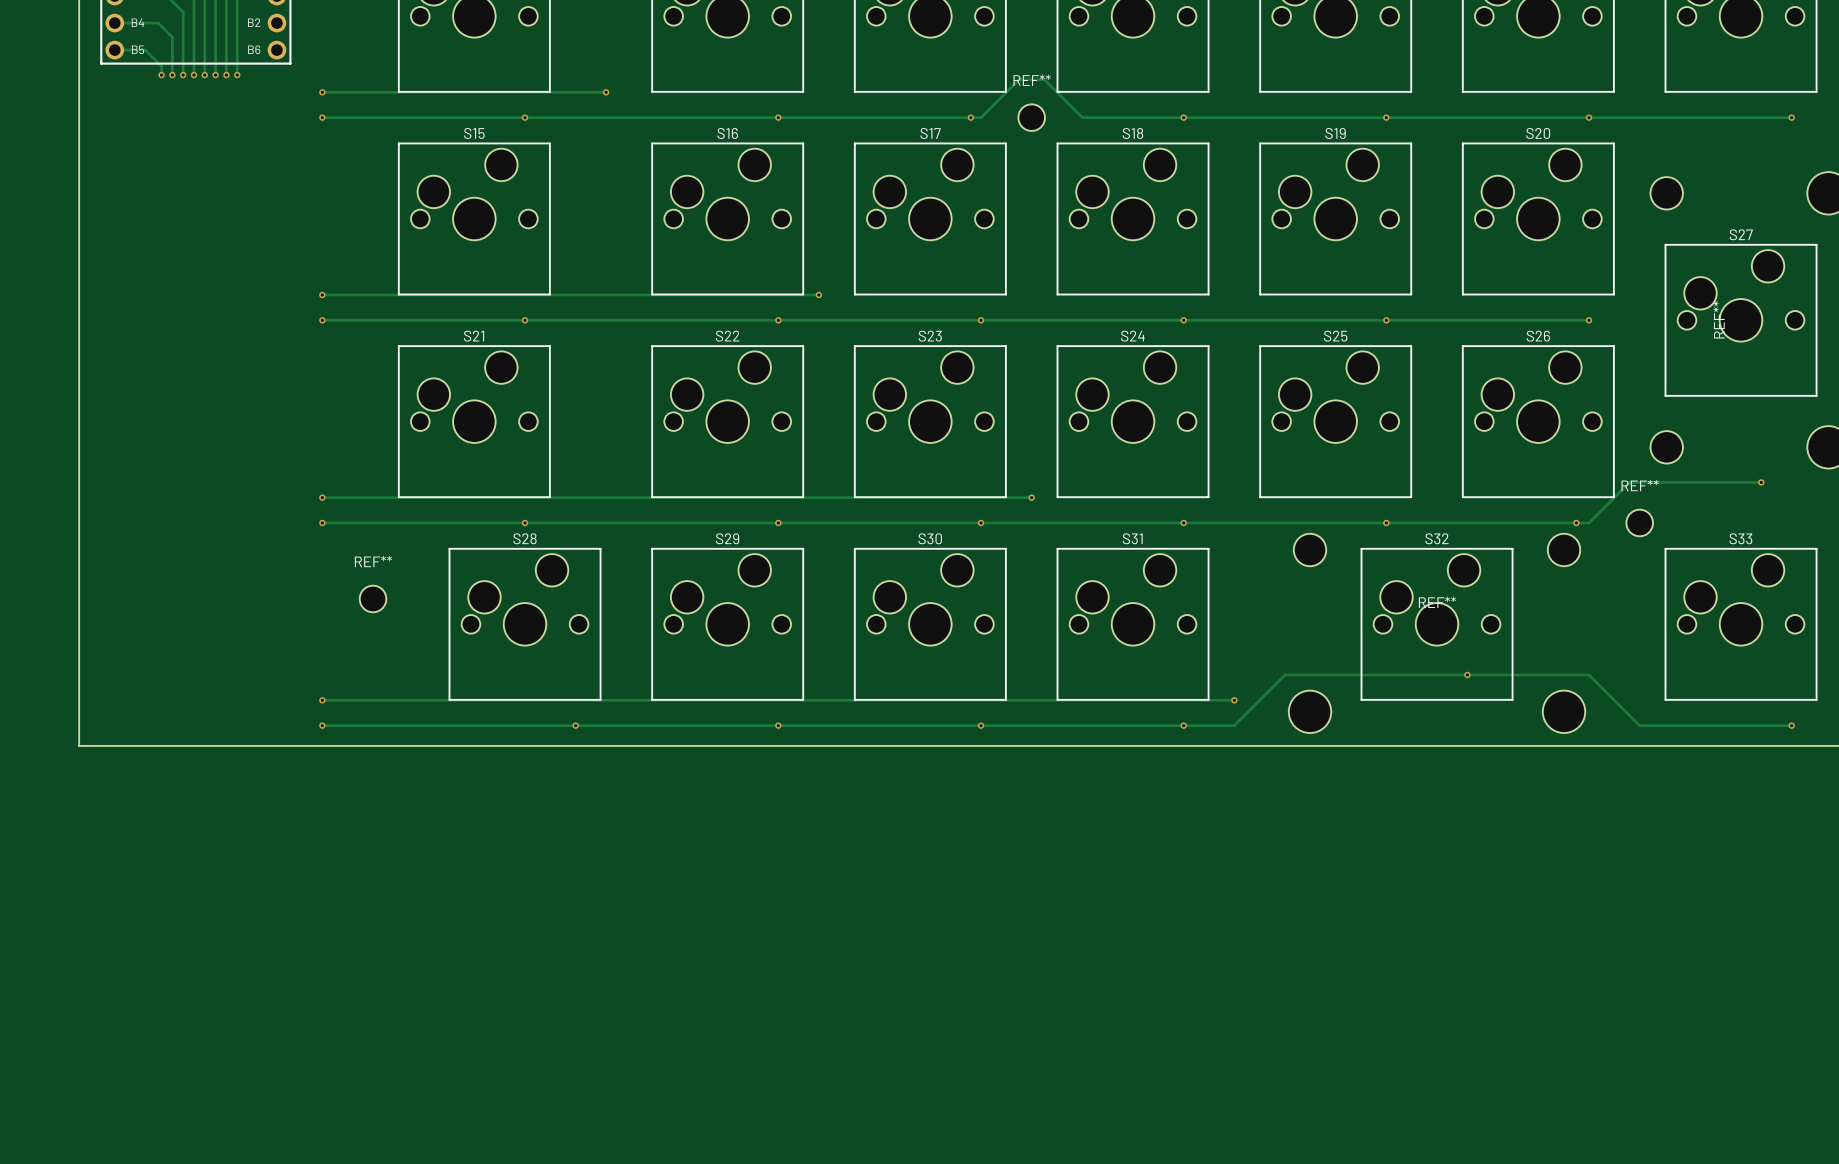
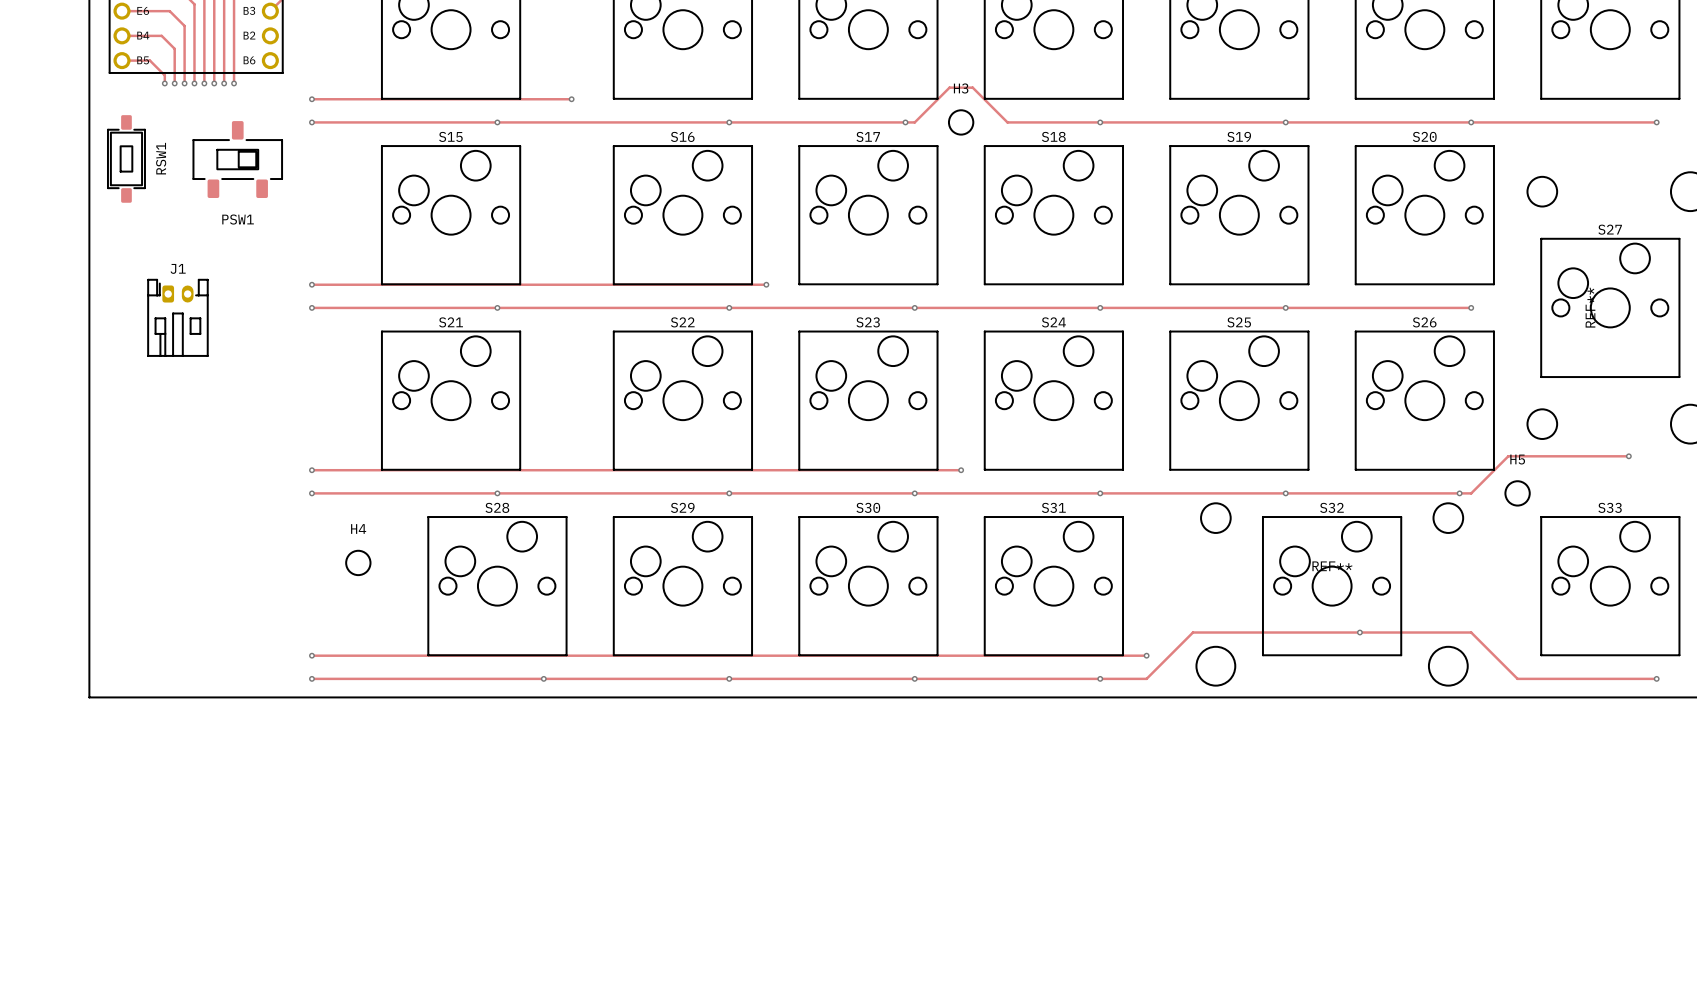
REF** name: REF** (1032, 80) -> H3 (961, 88)
RSW1: none -> (126, 158)
PSW1: none -> (237, 159)
J1: none -> (177, 317)
REF** name: REF** (1640, 485) -> H5 (1517, 459)
REF** name: REF** (373, 561) -> H4 (358, 529)

